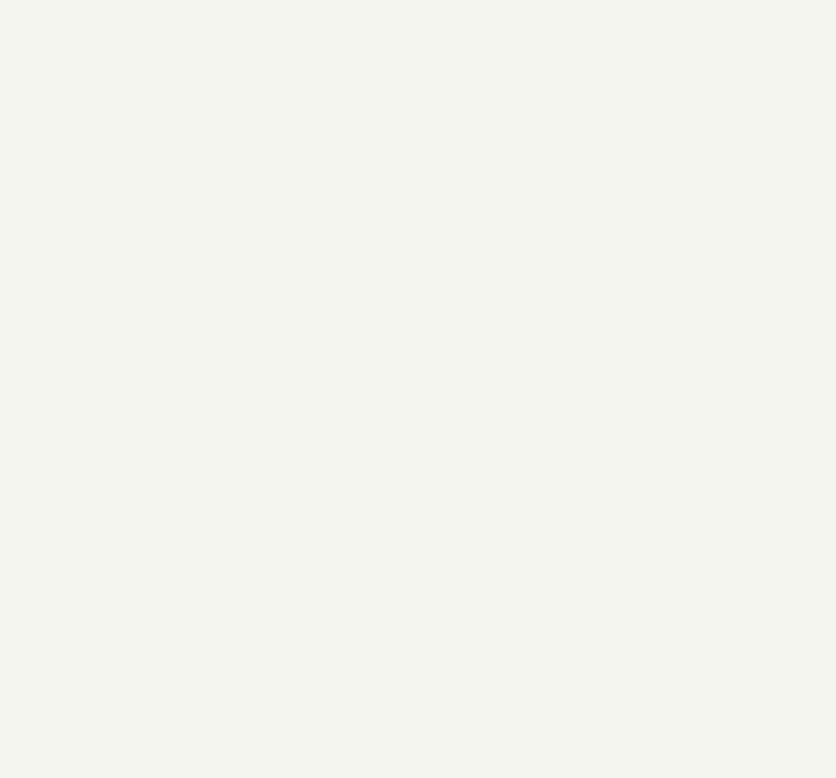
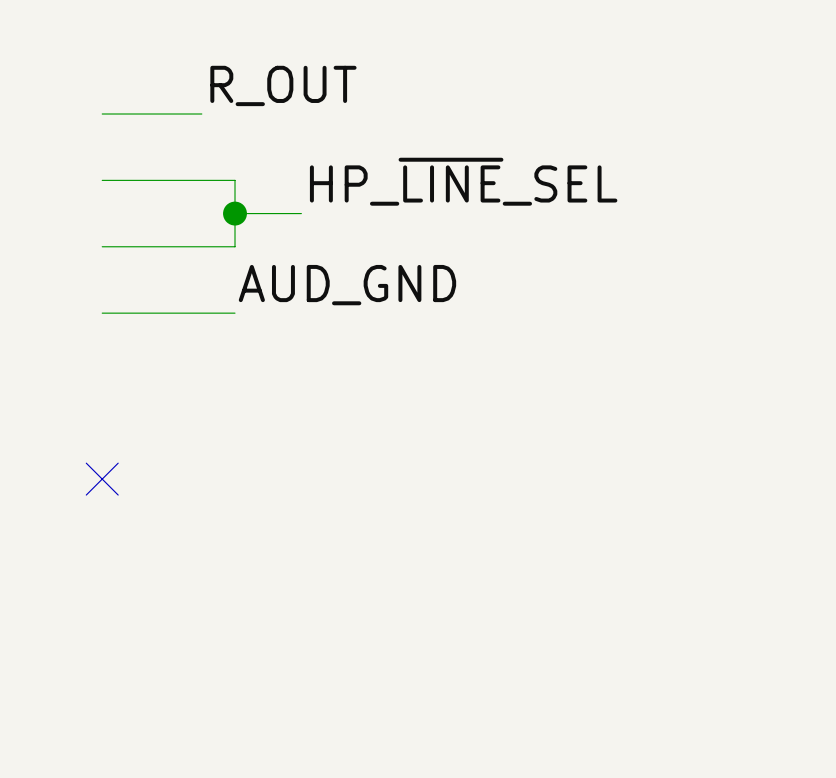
label: none -> R_OUT (283, 85)
wire: none -> (102, 114) (201, 114)
wire: none -> (102, 180) (235, 180) (235, 246) (102, 246)
label: none -> HP_~{LINE}_SEL (463, 181)
wire: none -> (235, 213) (301, 213)
junction: none -> (235, 213)
label: none -> AUD_GND (347, 285)
wire: none -> (102, 313) (235, 313)
no-connect mark: none -> (102, 479)

